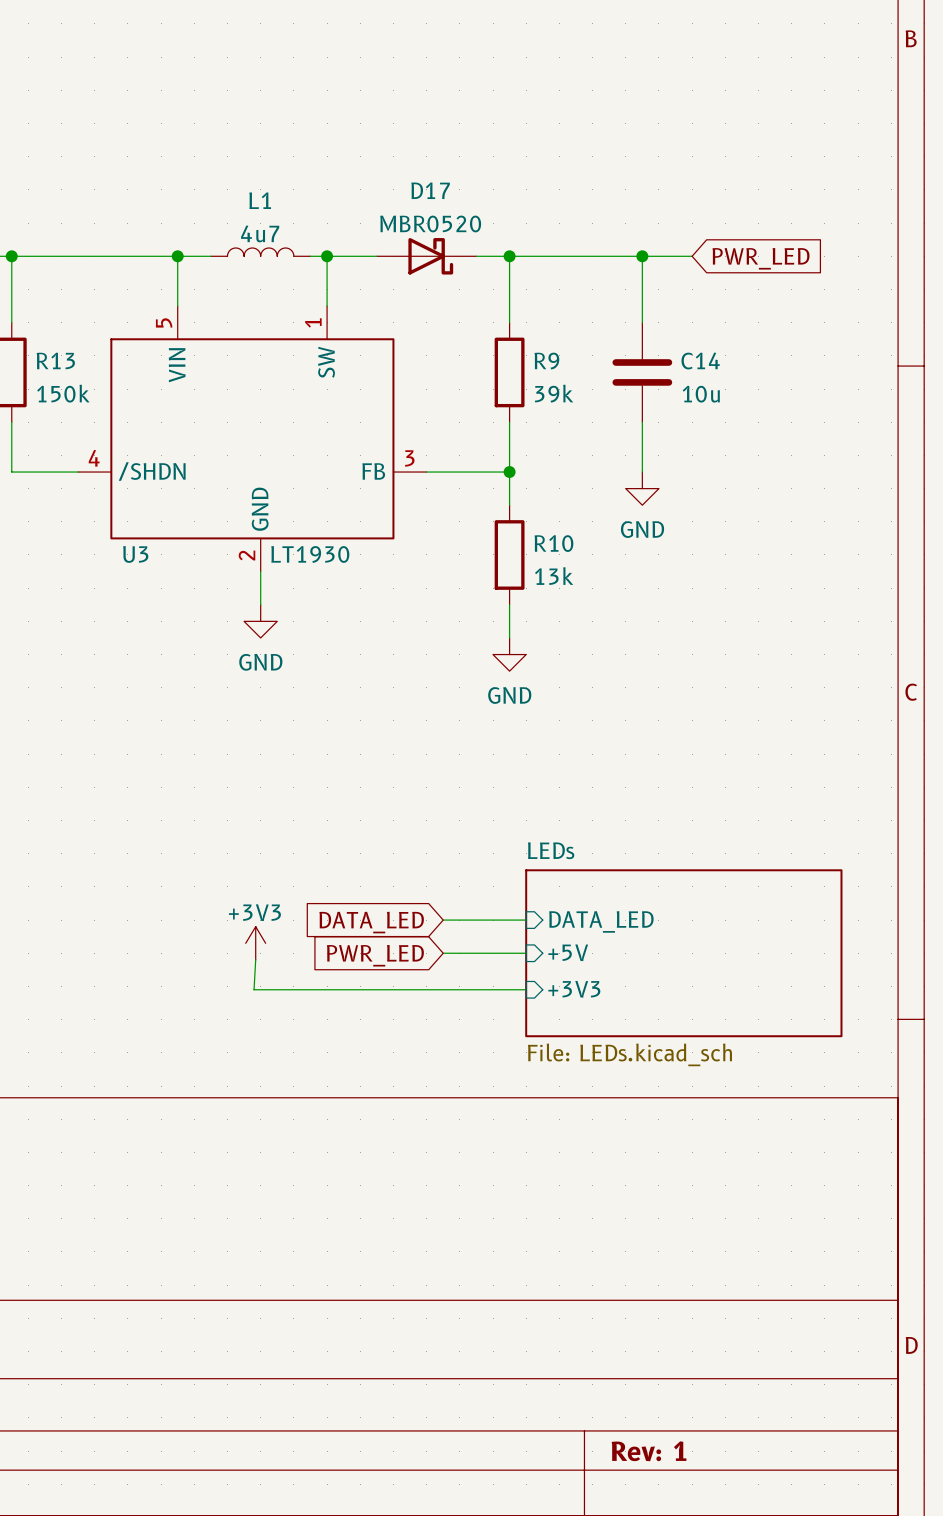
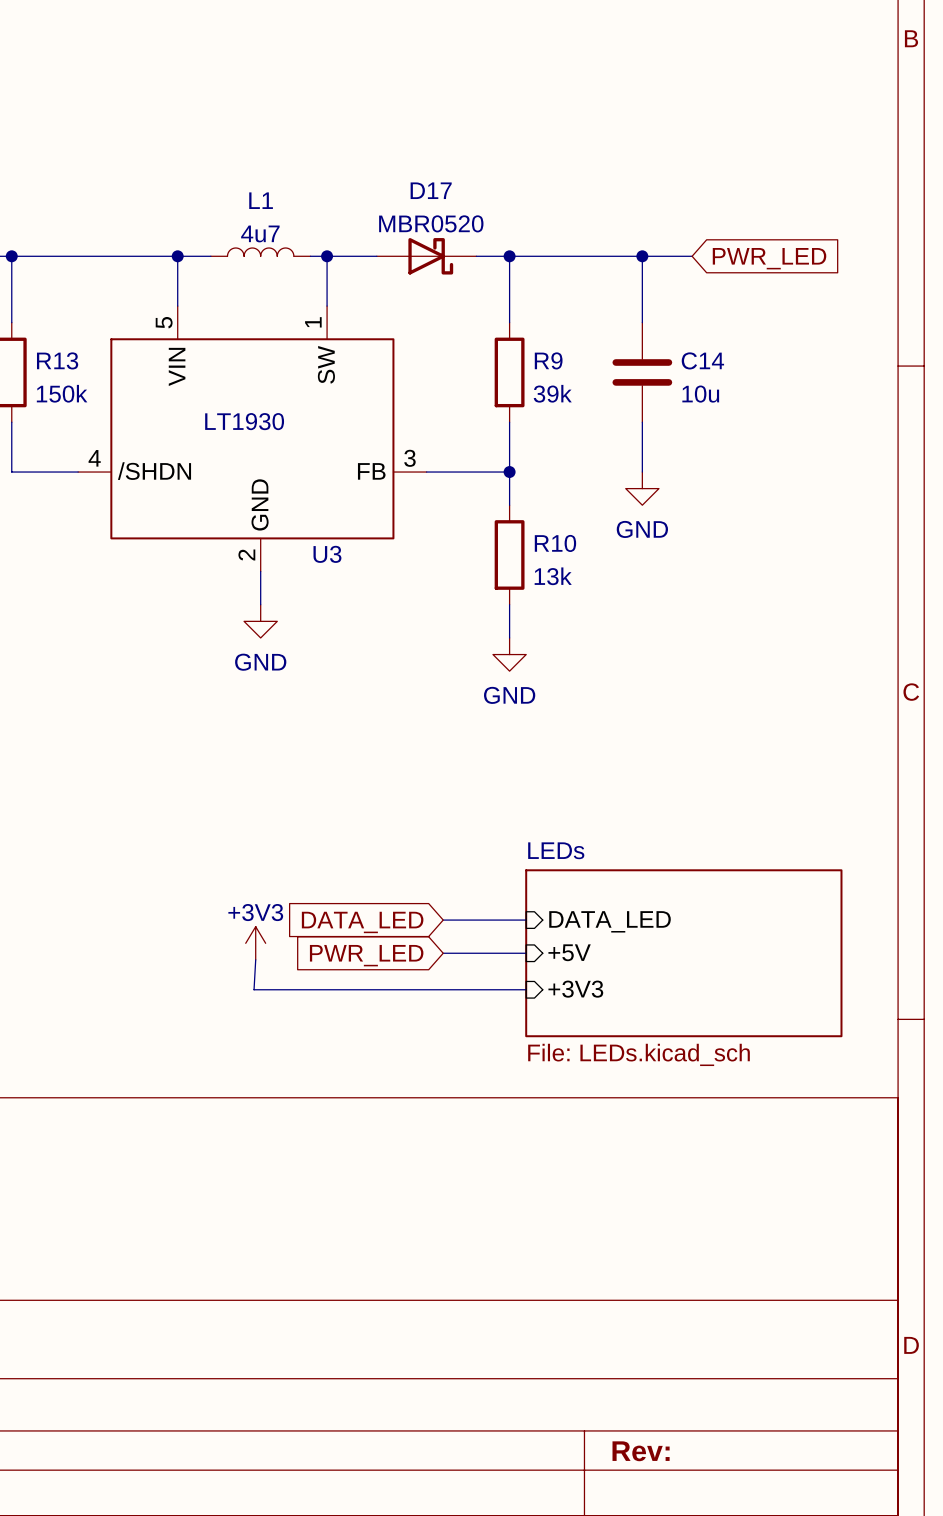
U3 name position: U3 (135, 554) -> U3 (327, 554)
U3 value position: LT1930 (310, 554) -> LT1930 (244, 421)
title block: Rev: 1 (649, 1451) -> Rev: (641, 1451)

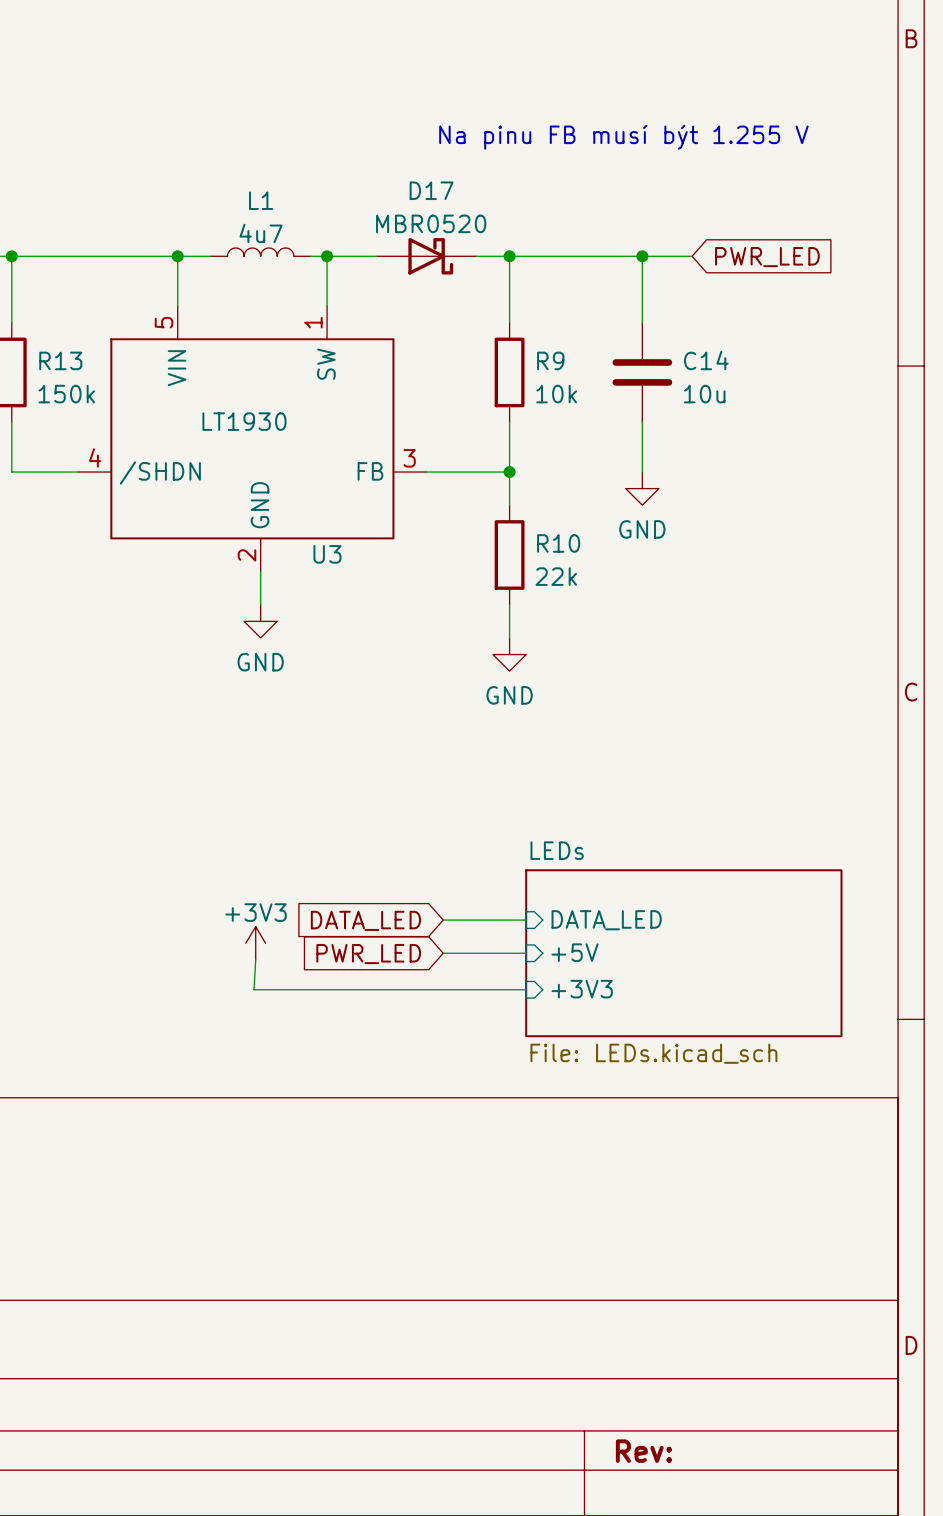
text: none -> Na pinu FB musí být 1.255 V (623, 137)
R9 value: 39k (552, 393) -> 10k (556, 394)
R10 value: 13k (553, 576) -> 22k (556, 576)

